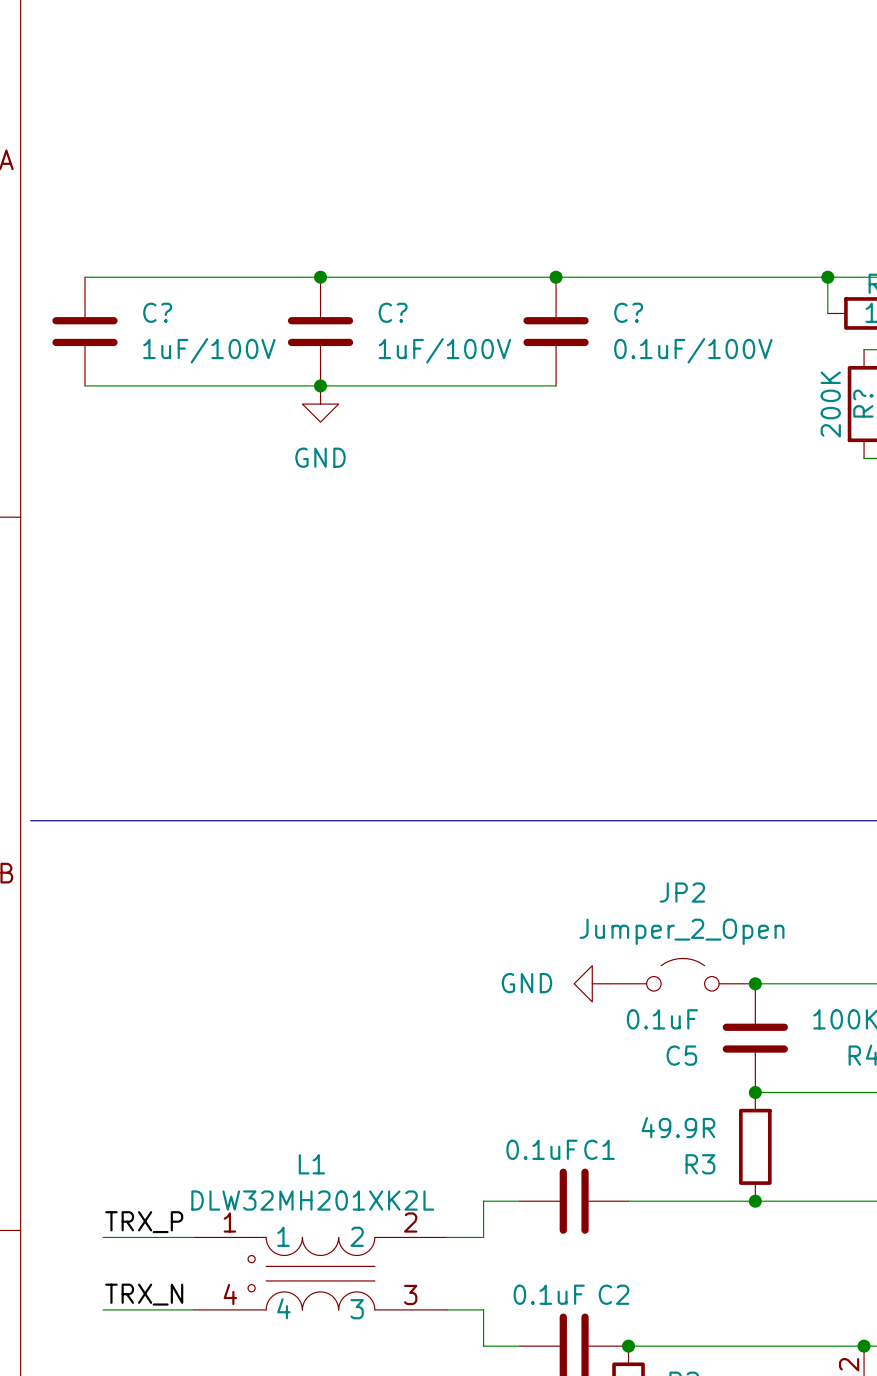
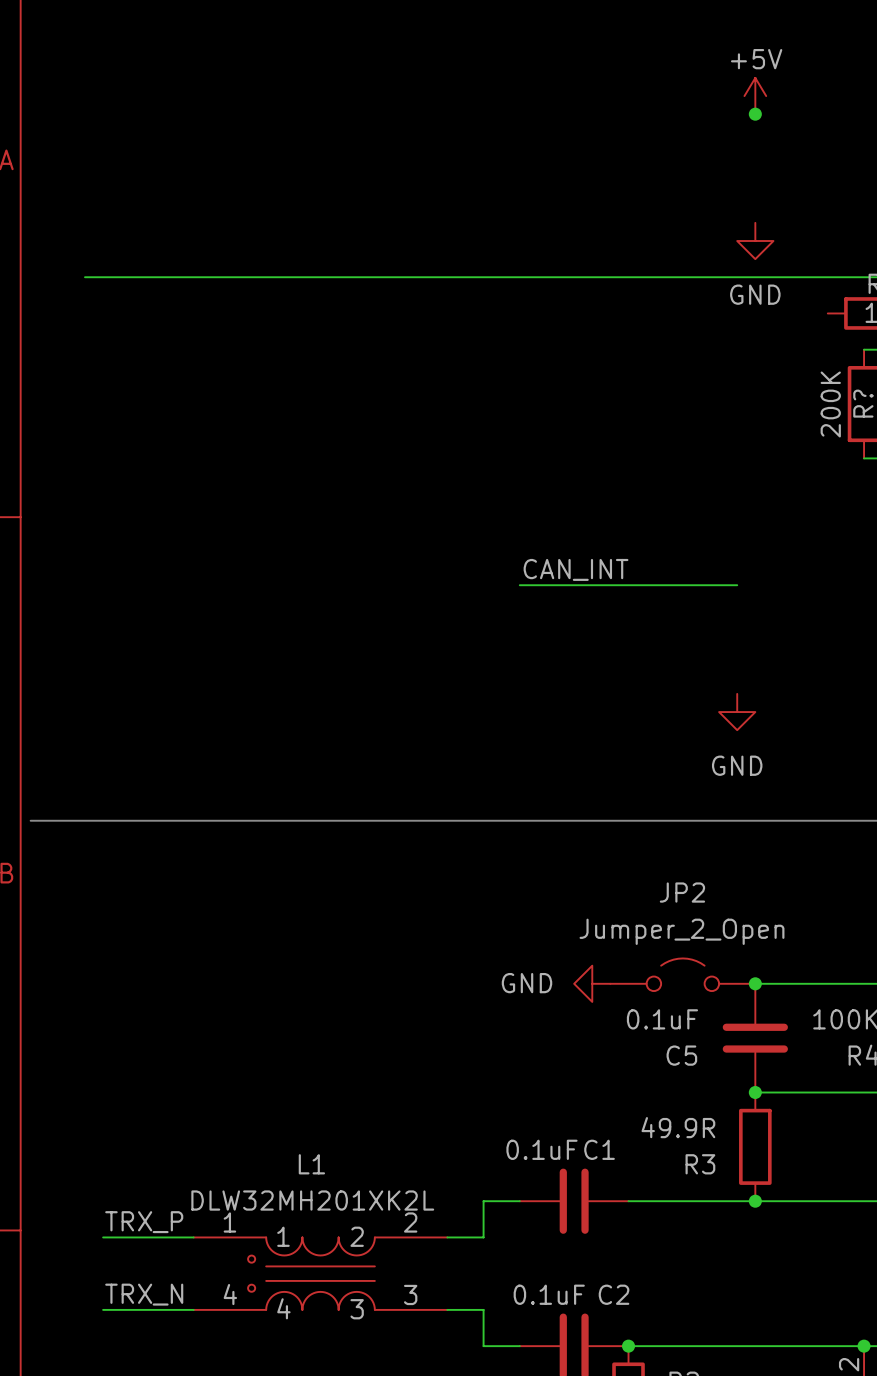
power symbol: none -> +5V (755, 96)
junction: none -> (755, 114)
power symbol: none -> GND (755, 241)
junction: (320, 277) -> none
junction: (556, 277) -> none
wire: (827, 277) (827, 313) -> none
junction: (827, 277) -> none
C?: 1uF/100V (85, 331) -> none
C?: 1uF/100V (320, 331) -> none
C?: 0.1uF/100V (556, 331) -> none
wire: (85, 385) (556, 385) -> none
junction: (320, 385) -> none
power symbol: GND (320, 404) -> none
label: none -> CAN_INT (576, 569)
wire: none -> (519, 585) (737, 585)
power symbol: none -> GND (737, 712)

